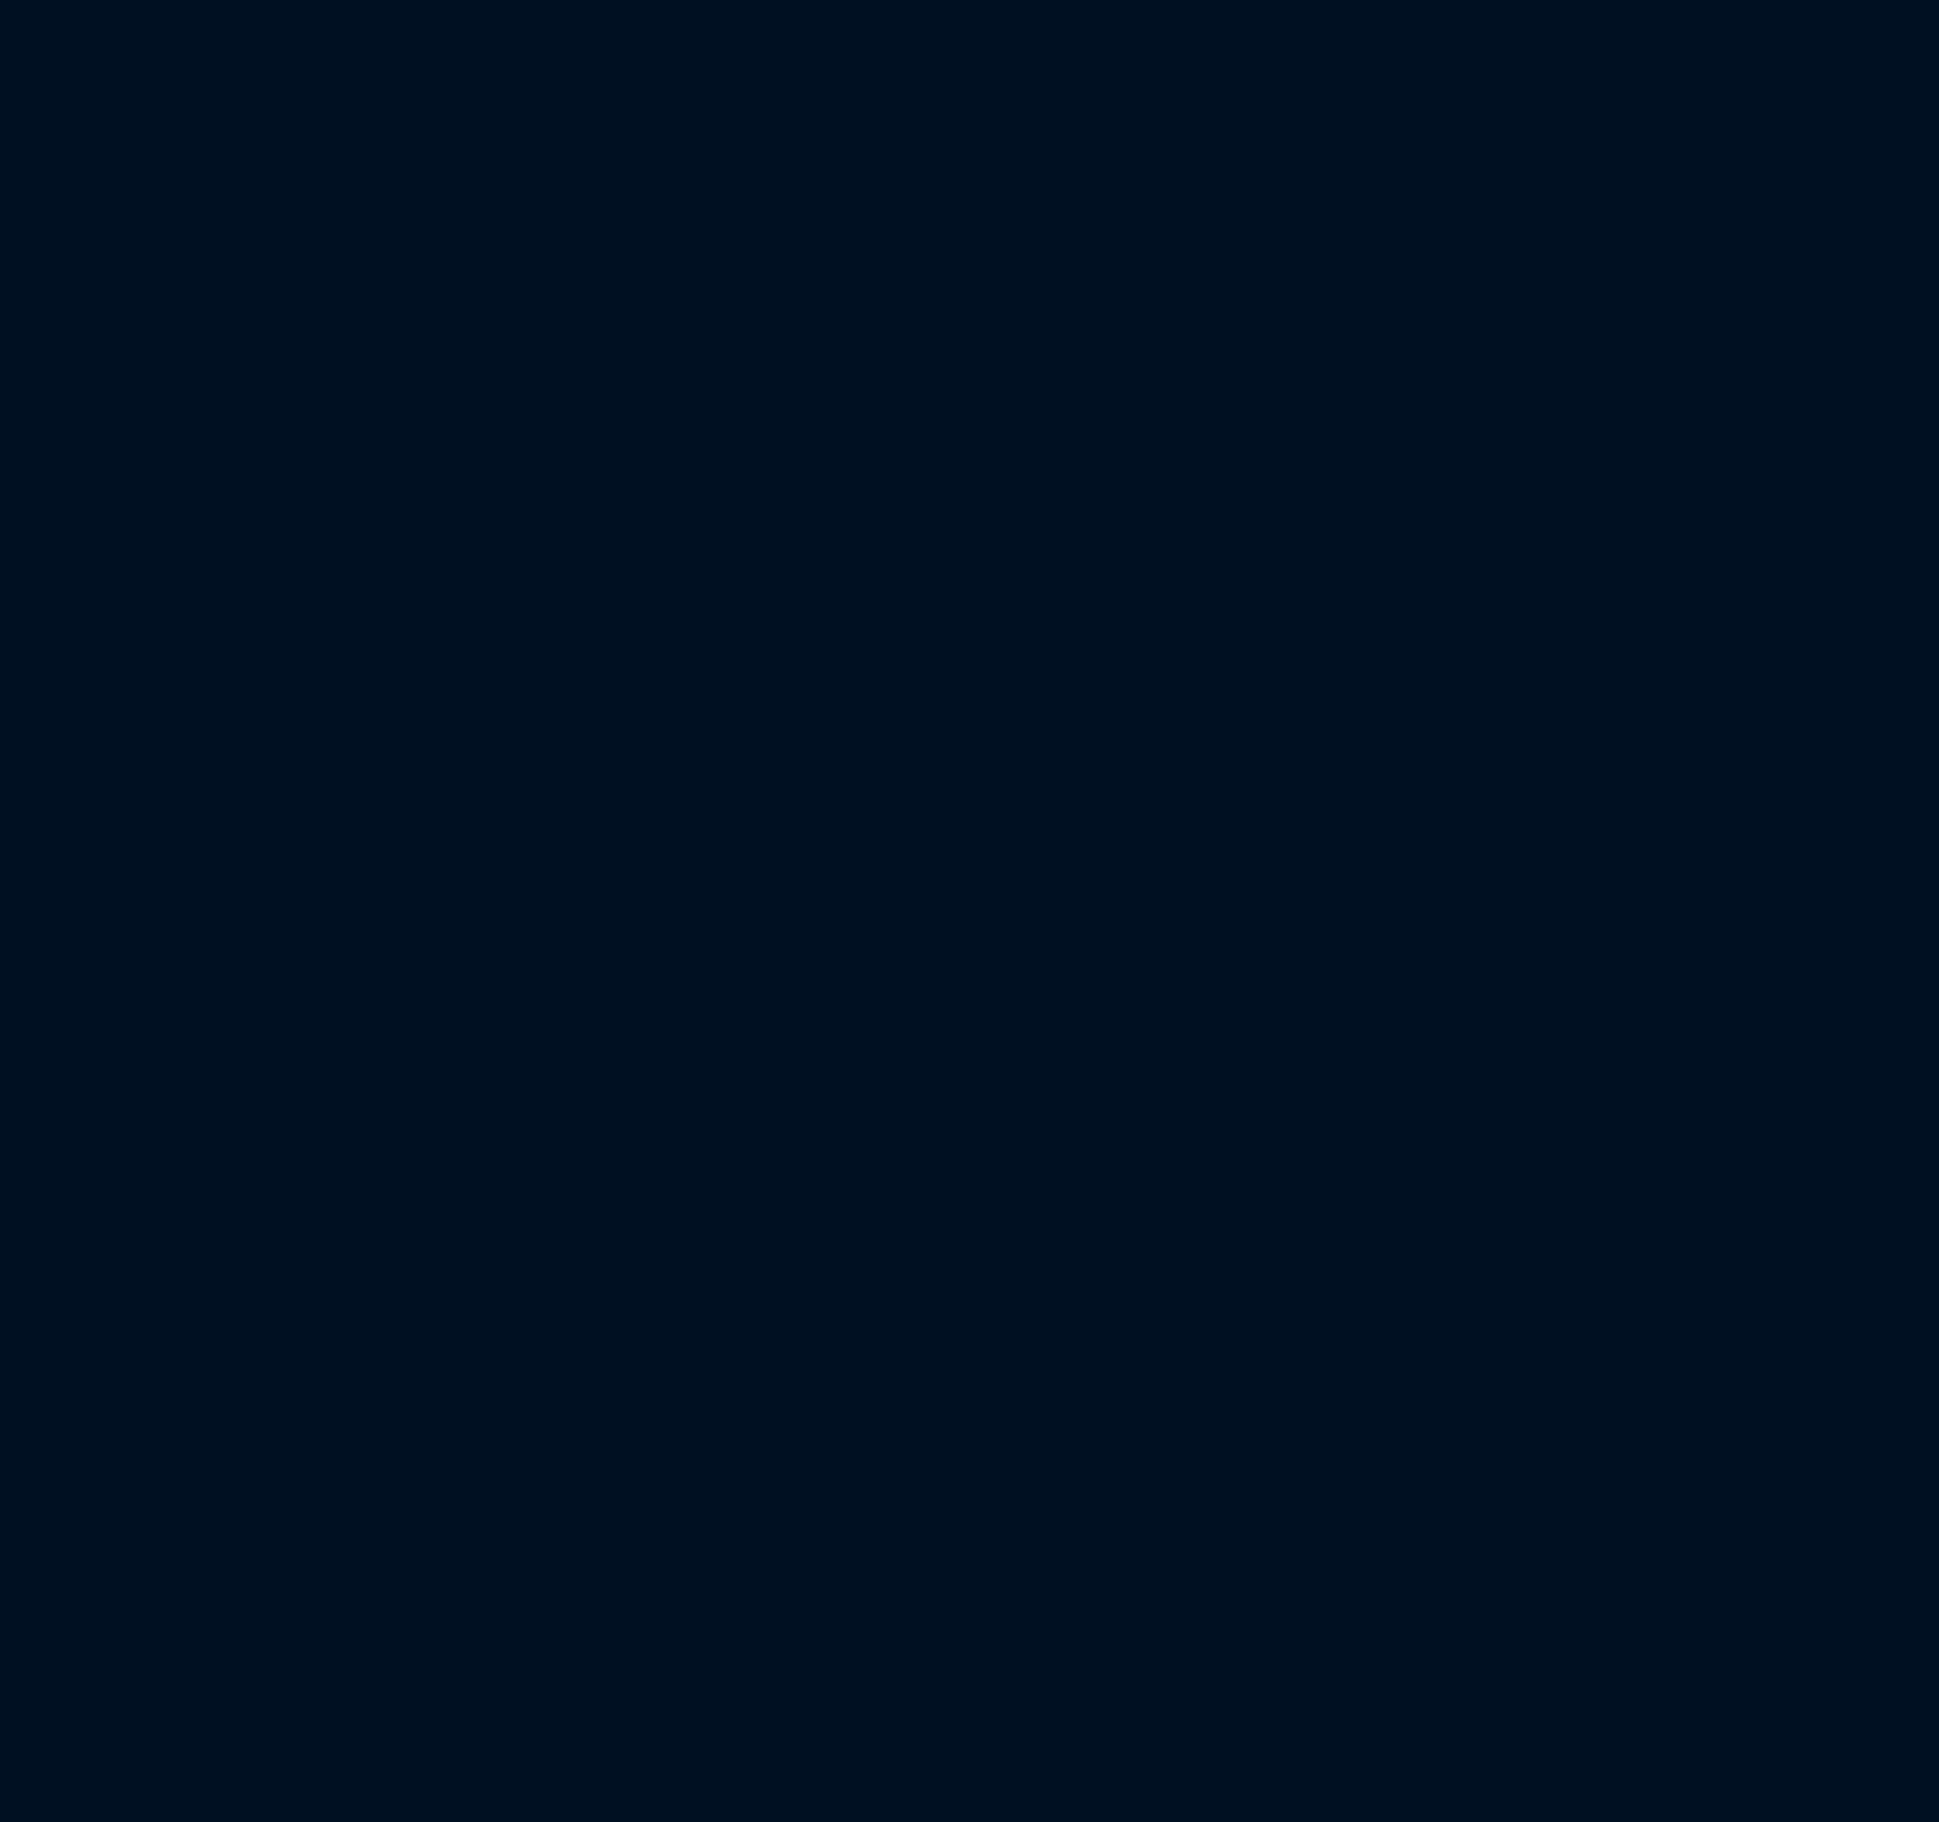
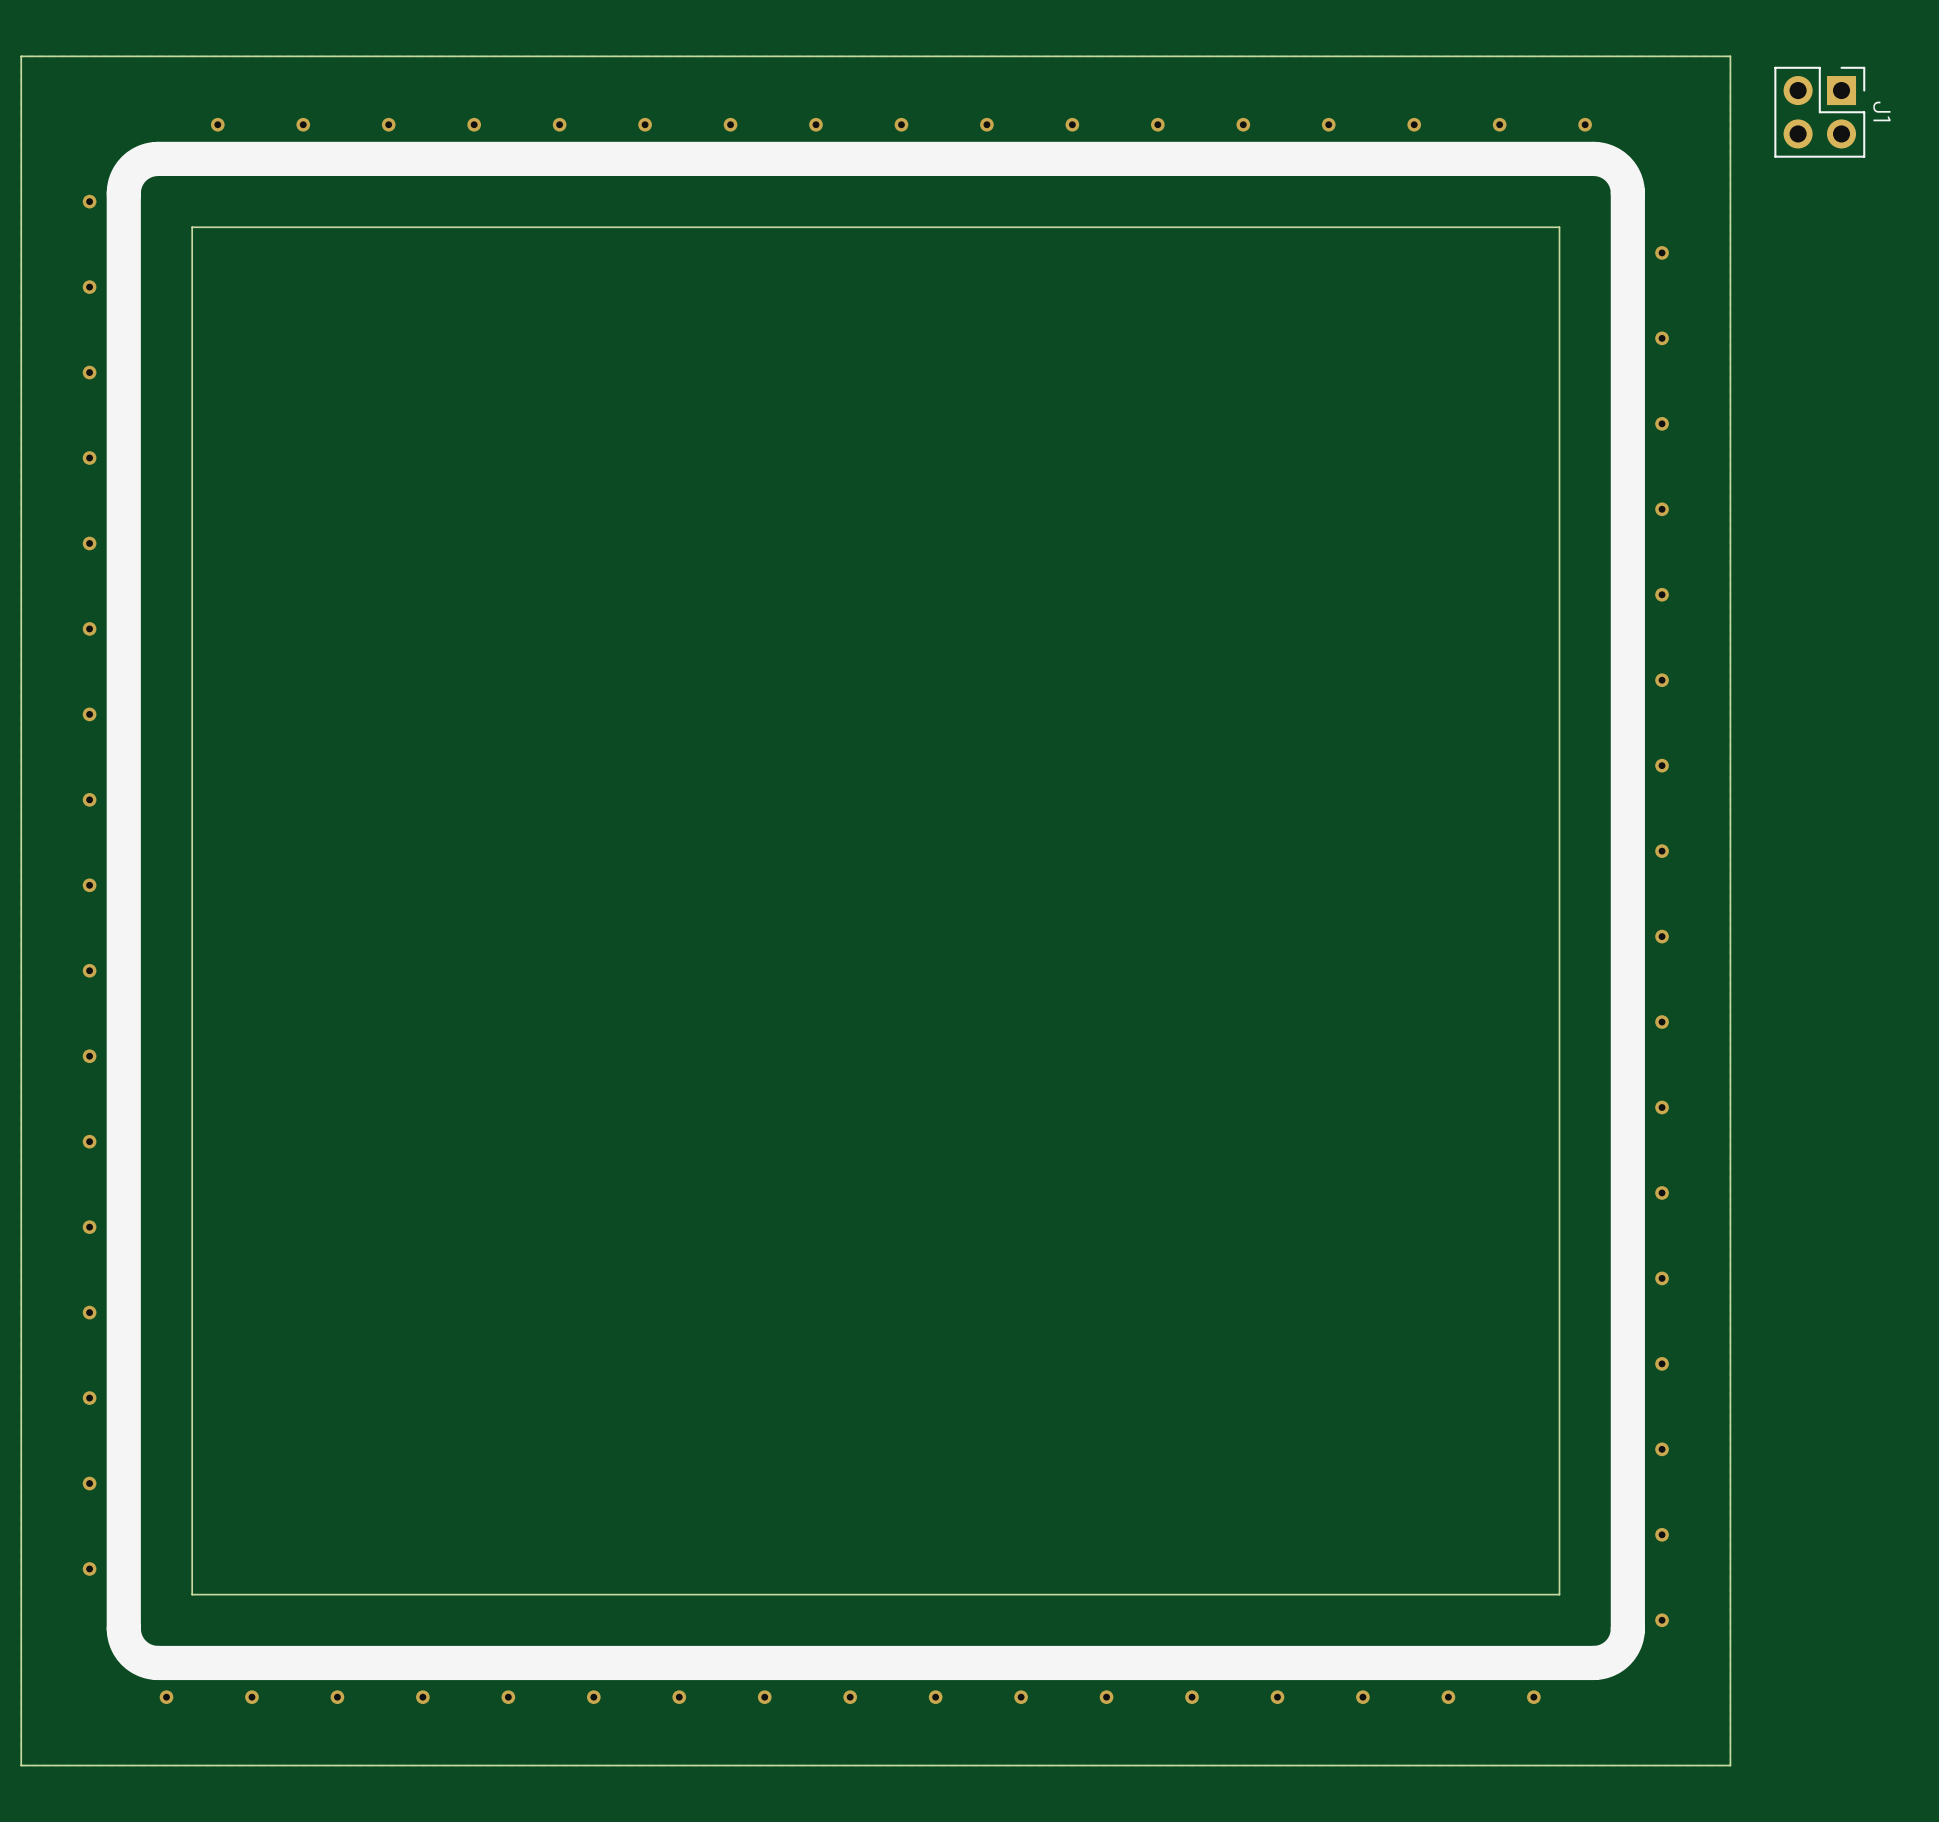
board edge: none -> (1730, 56) (1730, 1765) (21, 1765) (21, 56) (1730, 56)
J1: none -> (1819, 112)
via: none -> (217, 124)
via: none -> (303, 124)
via: none -> (388, 124)
via: none -> (474, 124)
via: none -> (559, 124)
via: none -> (645, 124)
via: none -> (730, 124)
via: none -> (816, 124)
via: none -> (901, 124)
via: none -> (986, 124)
via: none -> (1072, 124)
via: none -> (1157, 124)
via: none -> (1243, 124)
via: none -> (1328, 124)
via: none -> (1414, 124)
via: none -> (1499, 124)
via: none -> (1585, 124)
line: none -> (1593, 158) (157, 158) (144, 161) (133, 168) (126, 180) (123, 193) (123, 1628) (126, 1641) (133, 1652) (144, 1660) (157, 1662) (1593, 1662) (1606, 1660) (1617, 1652) (1625, 1641) (1627, 1628) (1627, 193) (1625, 180) (1617, 168) (1606, 161) (1593, 158)
via: none -> (89, 201)
board edge: none -> (1559, 227) (1559, 1594) (192, 1594) (192, 227) (1559, 227)
via: none -> (1662, 252)
via: none -> (89, 287)
via: none -> (1662, 338)
via: none -> (89, 372)
via: none -> (1662, 423)
via: none -> (89, 458)
via: none -> (1662, 509)
via: none -> (89, 543)
via: none -> (1662, 594)
via: none -> (89, 628)
via: none -> (1662, 680)
via: none -> (89, 714)
via: none -> (1662, 765)
via: none -> (89, 799)
via: none -> (1662, 851)
via: none -> (89, 885)
via: none -> (1662, 936)
via: none -> (89, 970)
via: none -> (1662, 1022)
via: none -> (89, 1056)
via: none -> (1662, 1107)
via: none -> (89, 1141)
via: none -> (1662, 1192)
via: none -> (89, 1227)
via: none -> (1662, 1278)
via: none -> (89, 1312)
via: none -> (1662, 1363)
via: none -> (89, 1398)
via: none -> (1662, 1449)
via: none -> (89, 1483)
via: none -> (1662, 1534)
via: none -> (89, 1568)
via: none -> (1662, 1620)
via: none -> (166, 1697)
via: none -> (251, 1697)
via: none -> (337, 1697)
via: none -> (422, 1697)
via: none -> (508, 1697)
via: none -> (593, 1697)
via: none -> (679, 1697)
via: none -> (764, 1697)
via: none -> (850, 1697)
via: none -> (935, 1697)
via: none -> (1021, 1697)
via: none -> (1106, 1697)
via: none -> (1192, 1697)
via: none -> (1277, 1697)
via: none -> (1362, 1697)
via: none -> (1448, 1697)
via: none -> (1533, 1697)

